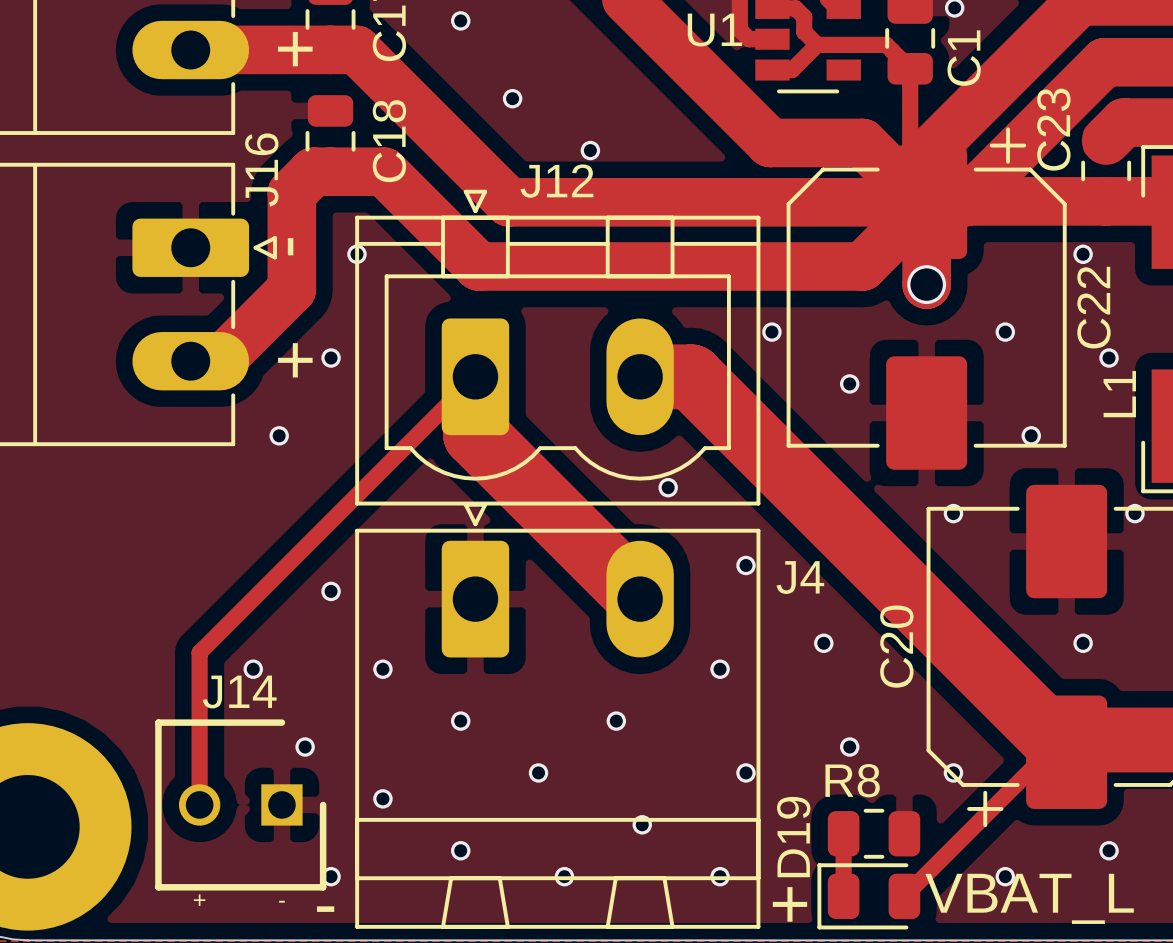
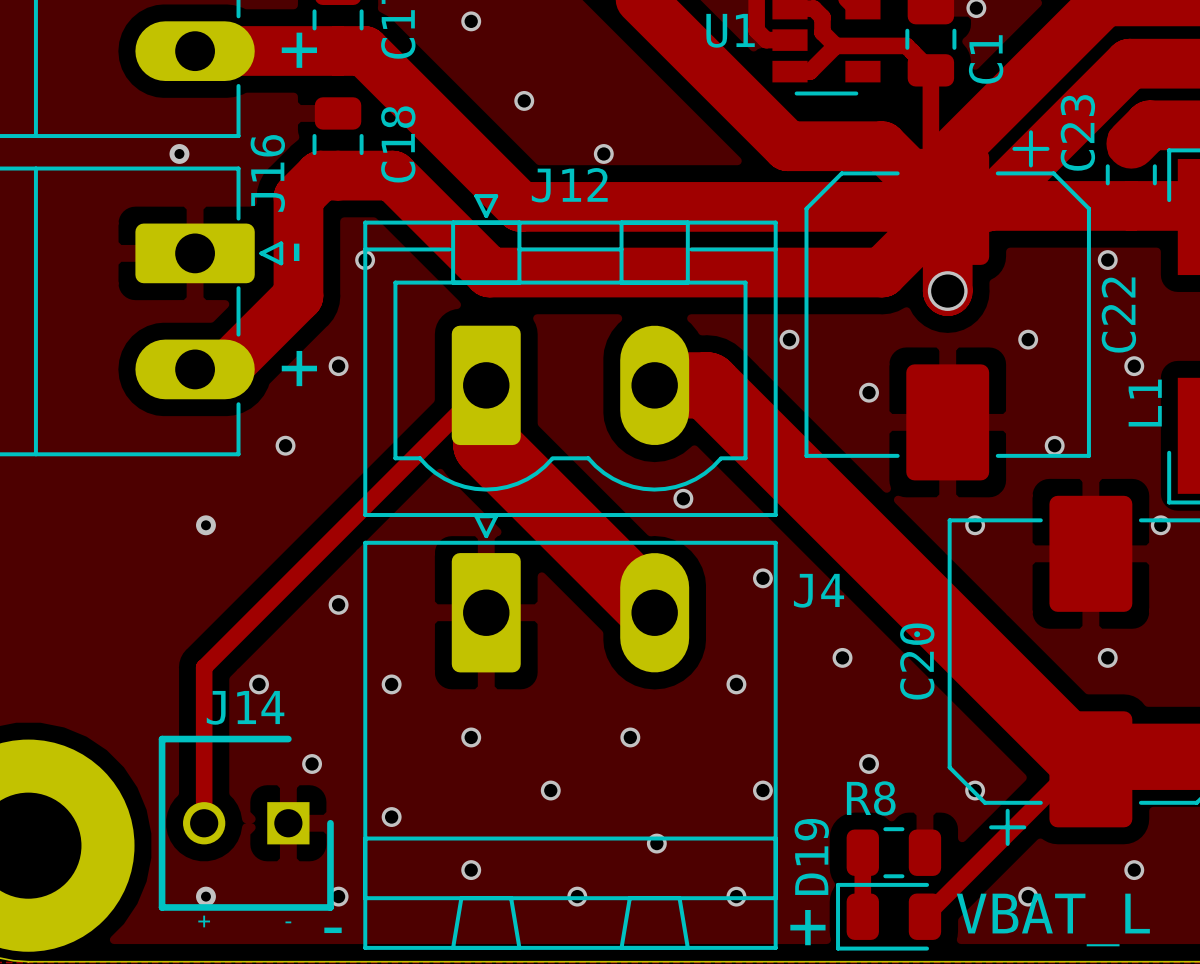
via: none -> (179, 153)
via: none -> (205, 525)
via: none -> (205, 896)

